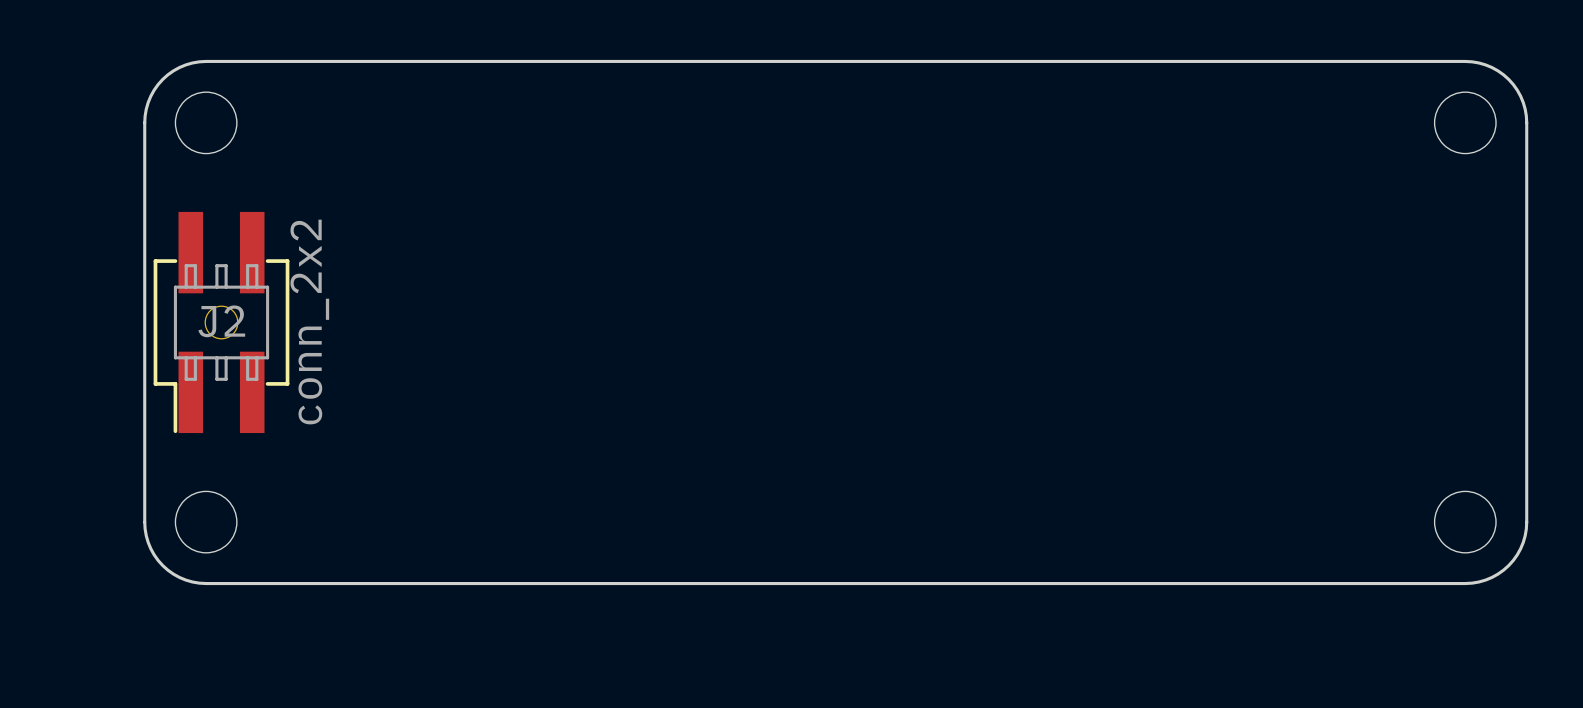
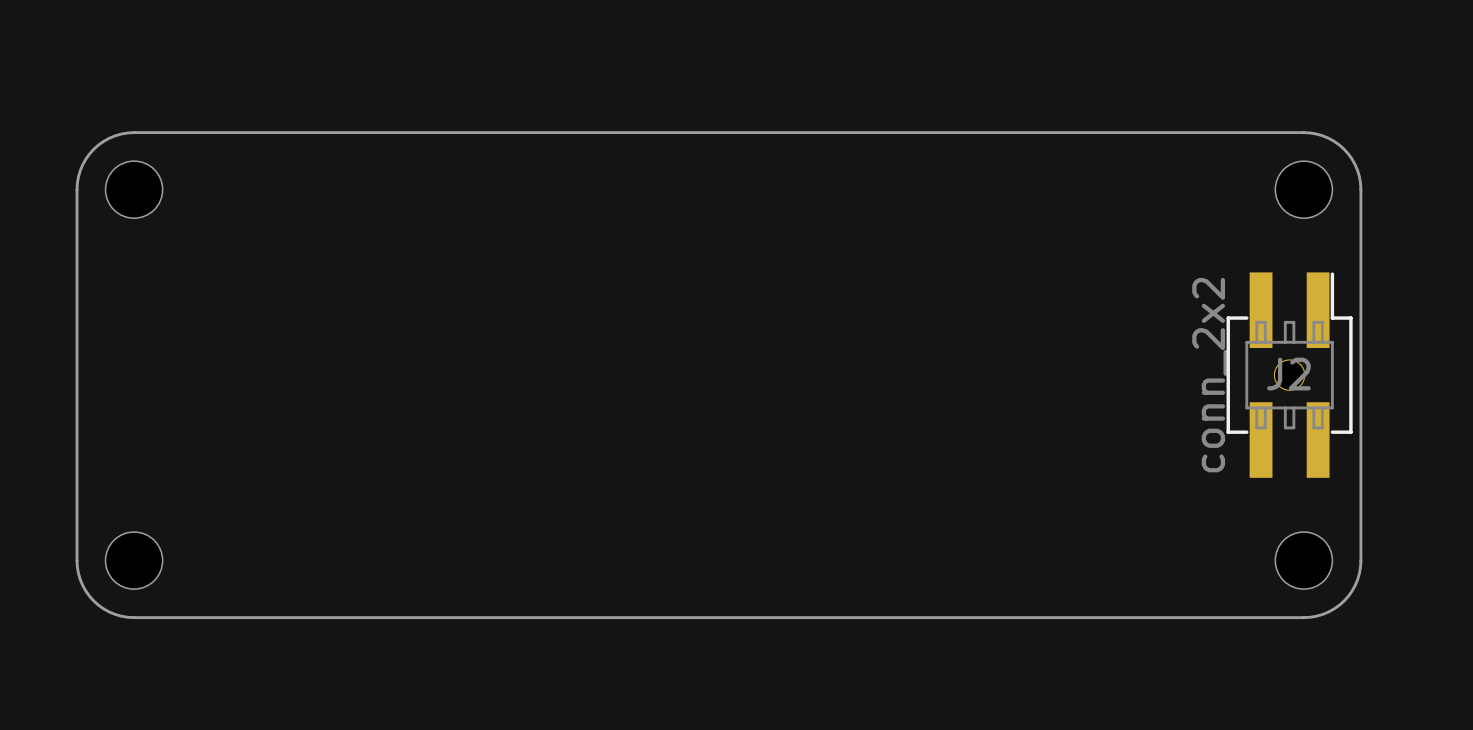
J2 rotation: 0° (221, 322) -> 180° (1289, 375)
J2 position: (221, 322) -> (1289, 375)

